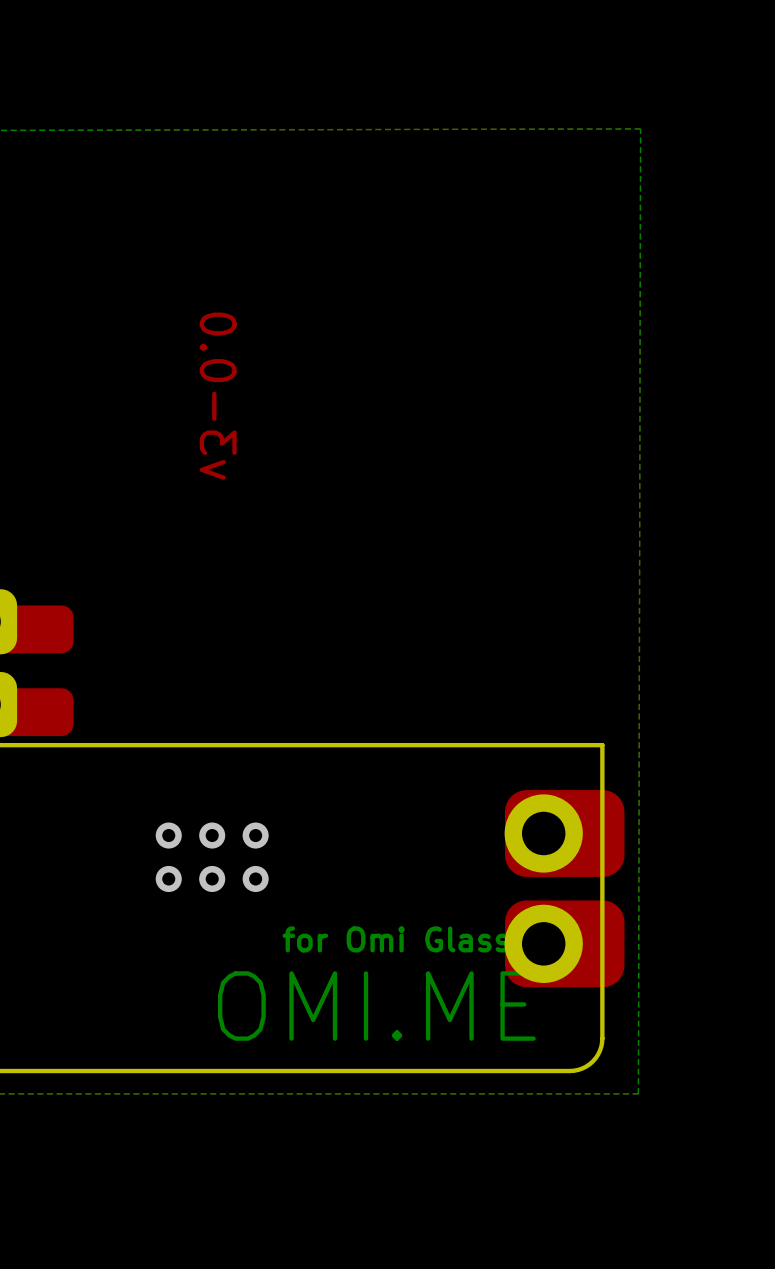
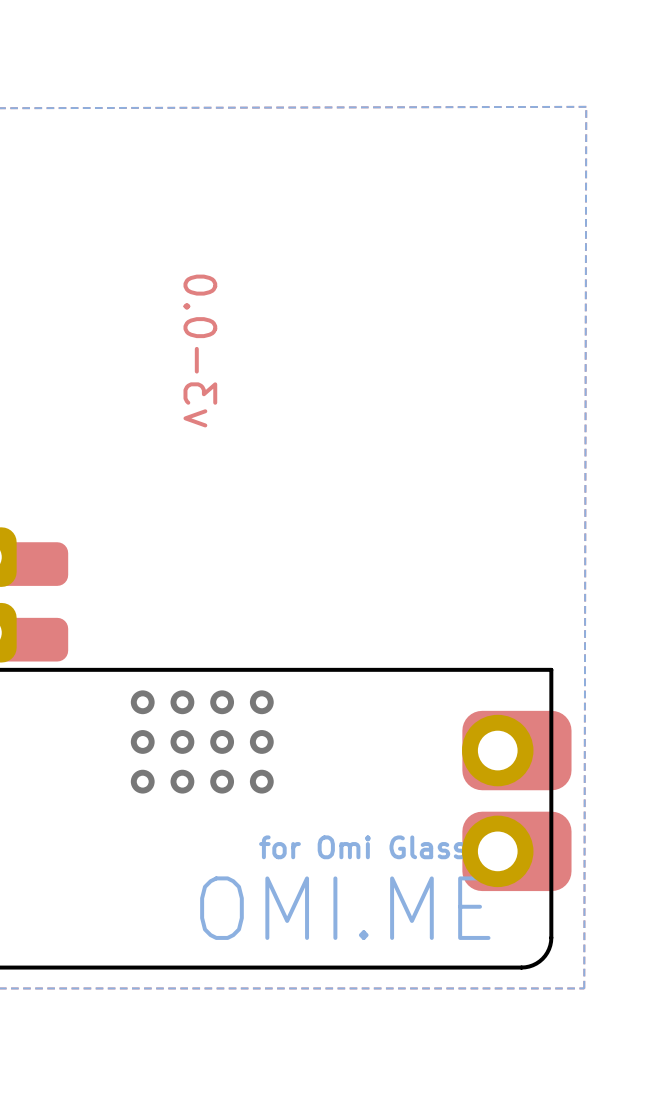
via: none -> (142, 702)
via: none -> (182, 702)
via: none -> (222, 702)
via: none -> (261, 702)
via: none -> (261, 741)
via position: (168, 835) -> (142, 741)
via position: (212, 835) -> (182, 741)
via position: (255, 835) -> (222, 741)
via: none -> (261, 781)
via position: (168, 878) -> (142, 781)
via position: (212, 878) -> (182, 781)
via position: (255, 878) -> (222, 781)

